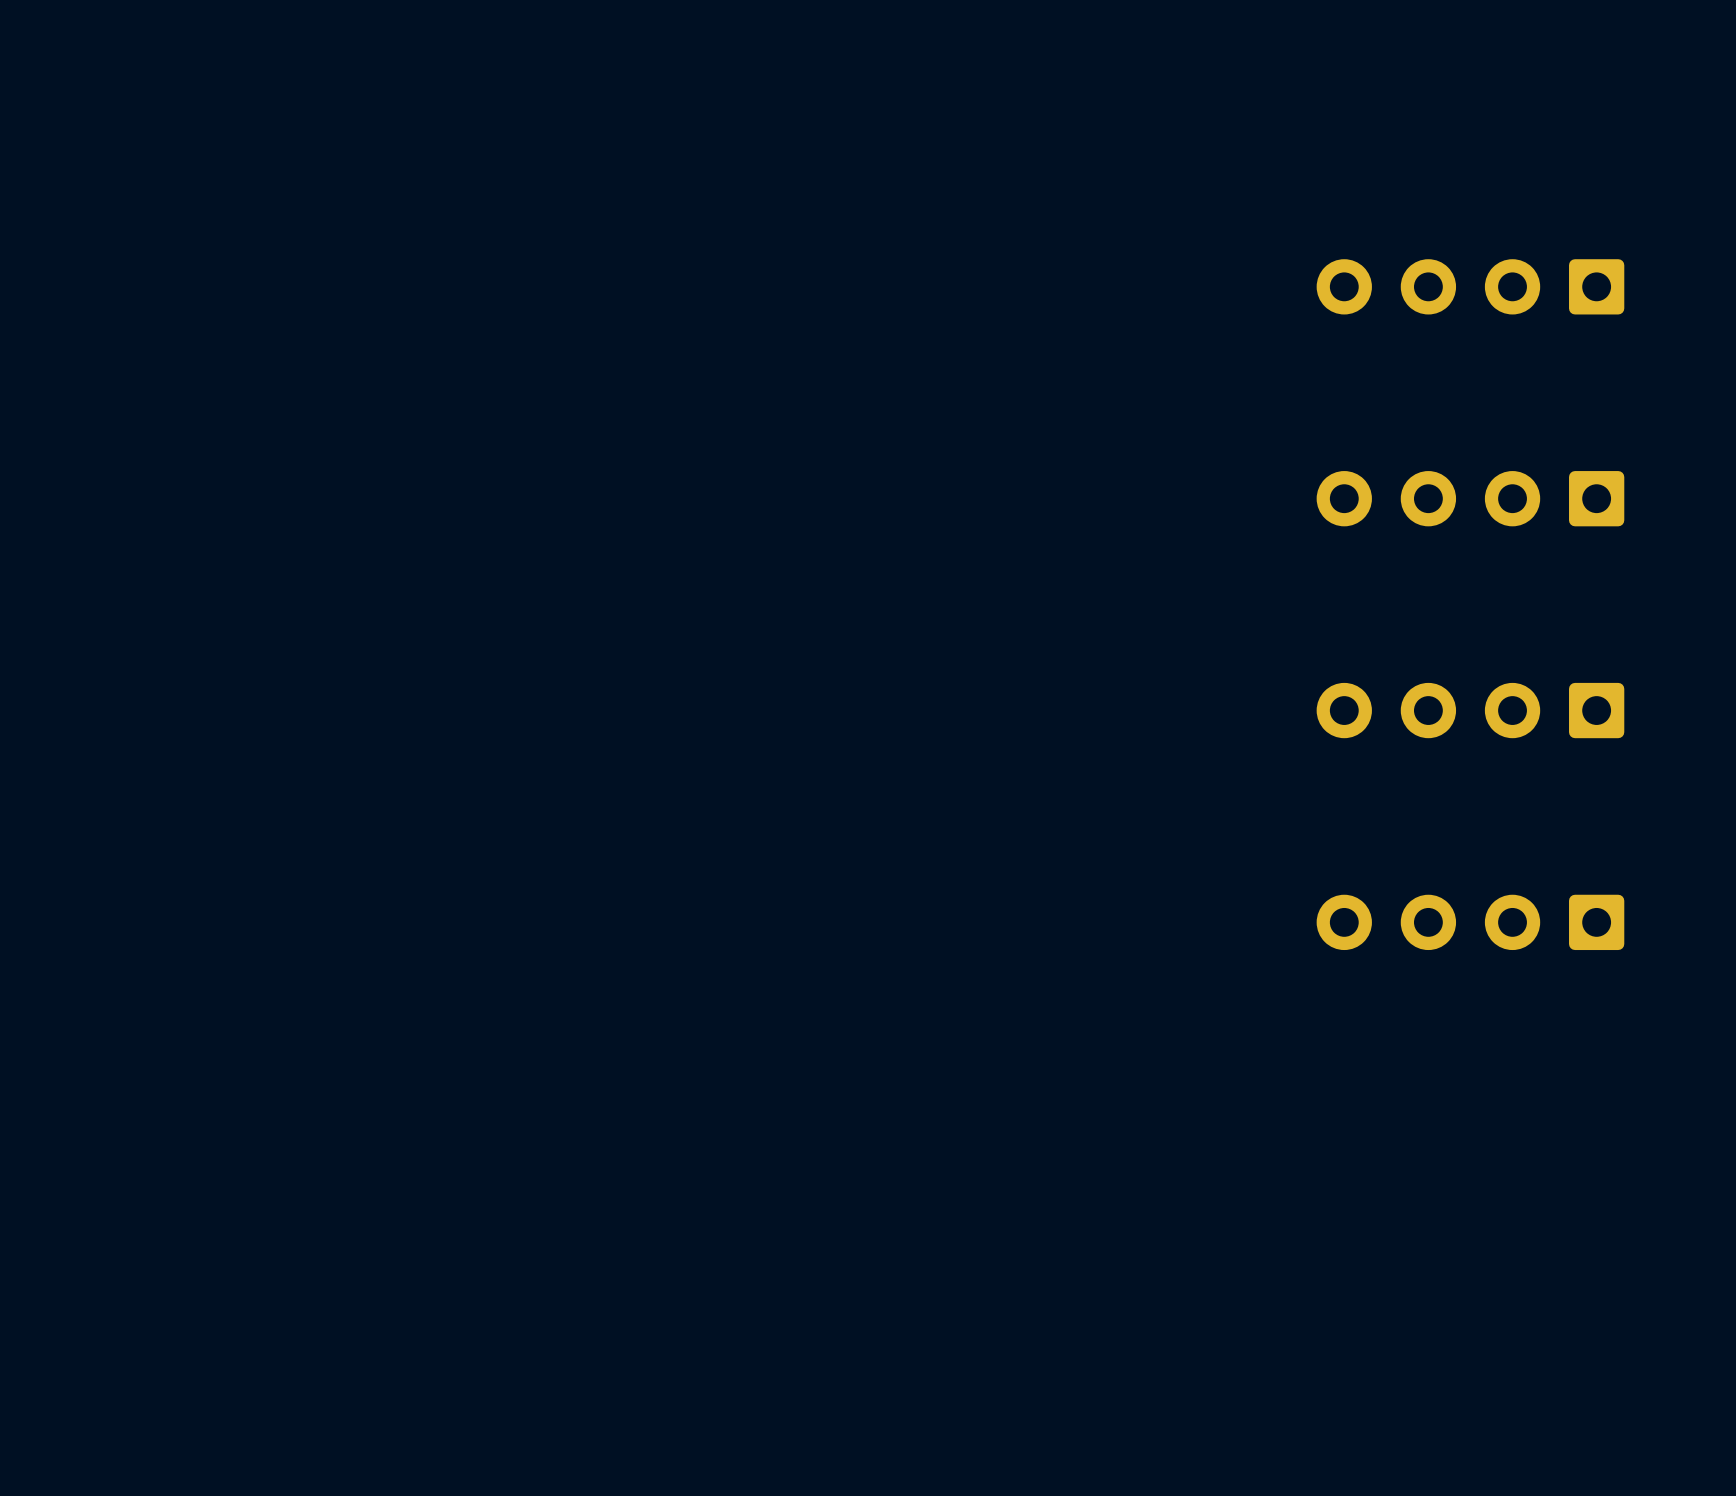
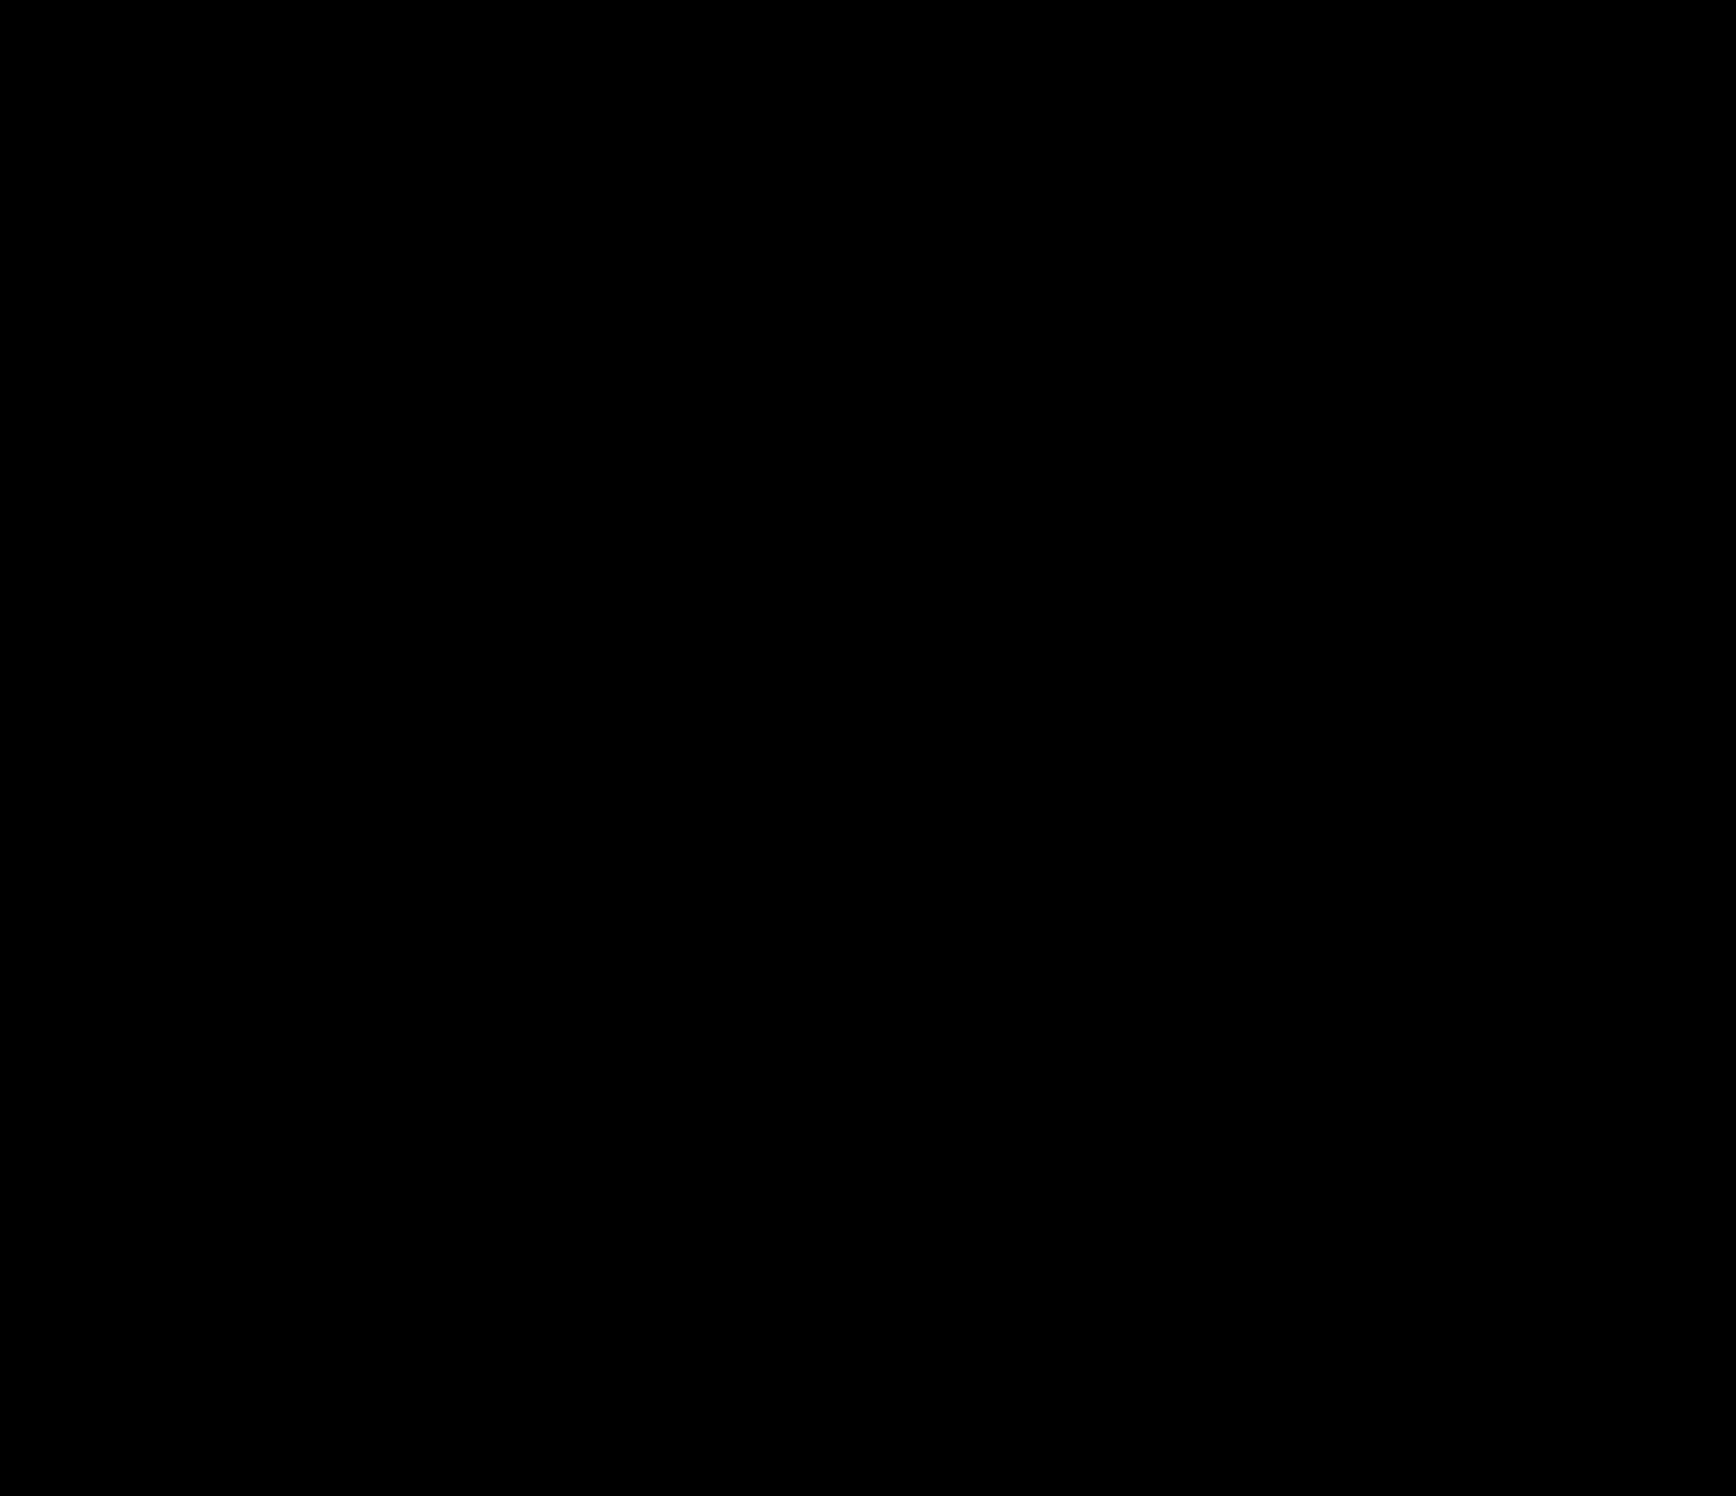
part: (1470, 286) -> none
part: (1470, 498) -> none
part: (1470, 710) -> none
part: (1470, 922) -> none

